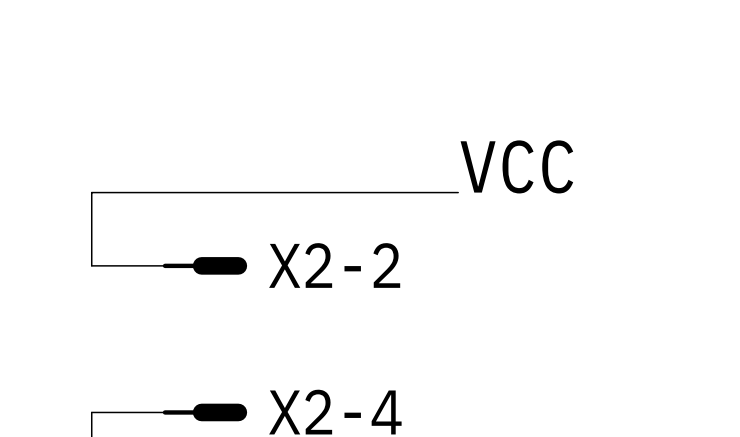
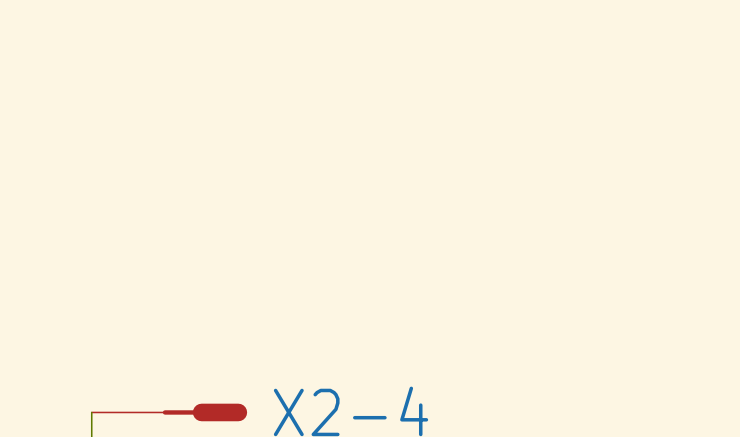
label: VCC (516, 166) -> none
wire: (458, 192) (91, 192) (91, 265) -> none
X2-2: (169, 265) -> none

